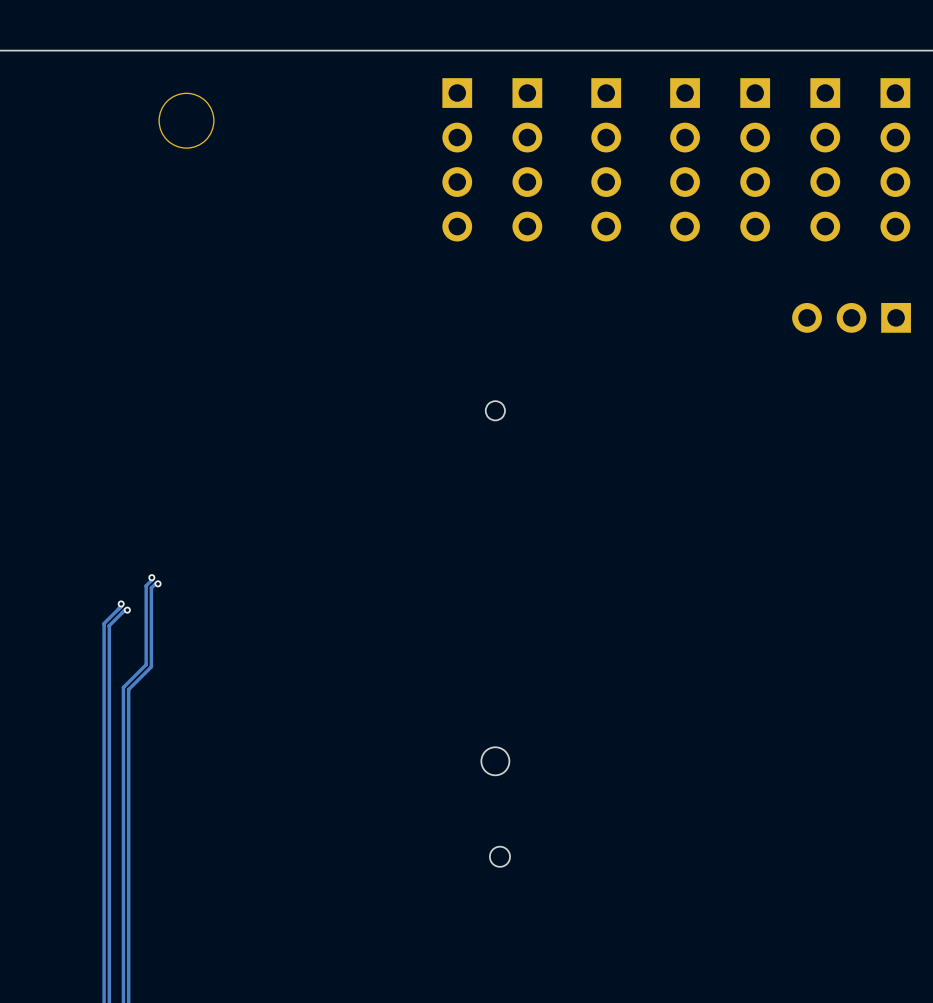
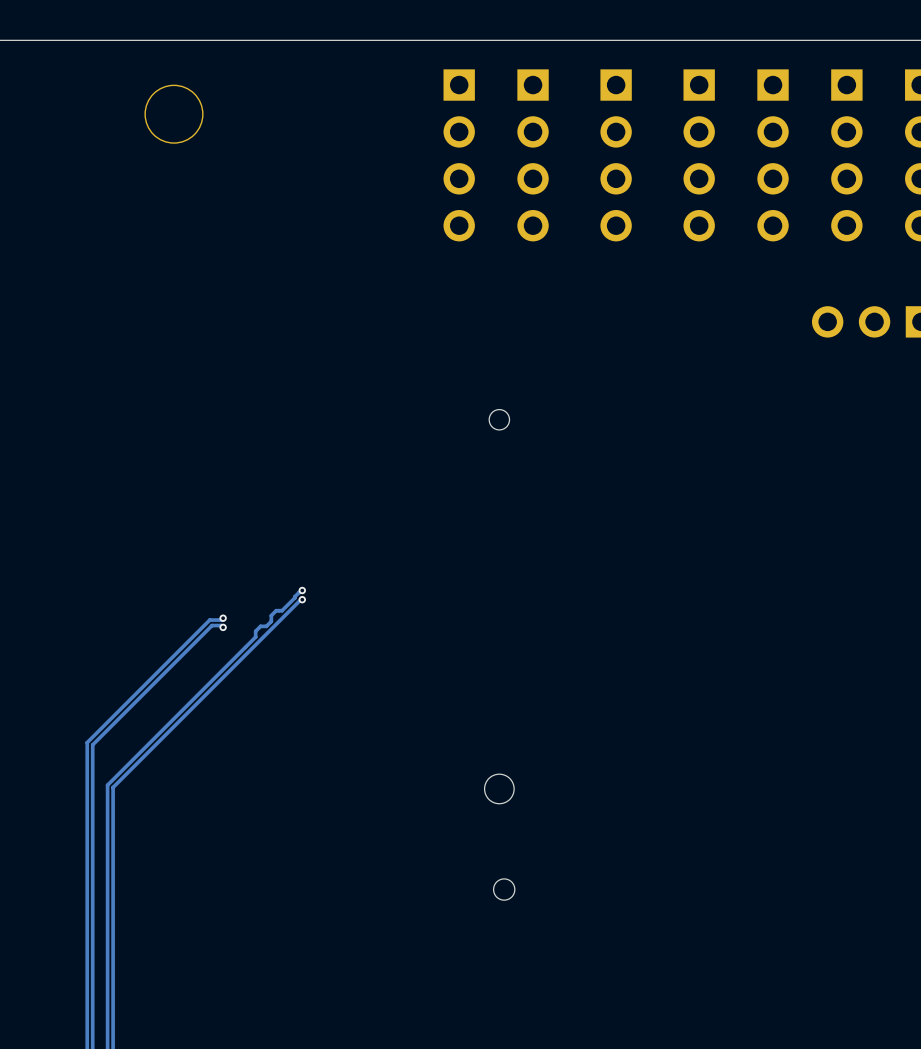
via: none -> (302, 590)
track: (151, 577) (146, 585) (146, 664) (123, 687) (123, 757) -> (302, 590) (282, 610) (276, 610) (271, 615) (271, 621) (266, 626) (260, 626) (255, 631) (255, 637) (107, 785)
via: (151, 577) -> none
via: none -> (302, 599)
track: (158, 583) (151, 587) (151, 666) (128, 689) (128, 759) -> (302, 599) (113, 787)
via: (158, 583) -> none
via: none -> (223, 618)
track: (121, 603) (121, 606) (104, 623) (104, 717) -> (223, 618) (221, 620) (209, 620) (87, 742)
via: (121, 603) -> none
via: none -> (223, 627)
track: (127, 610) (124, 610) (109, 625) (109, 719) -> (223, 627) (221, 625) (212, 625) (92, 744)
via: (127, 610) -> none

